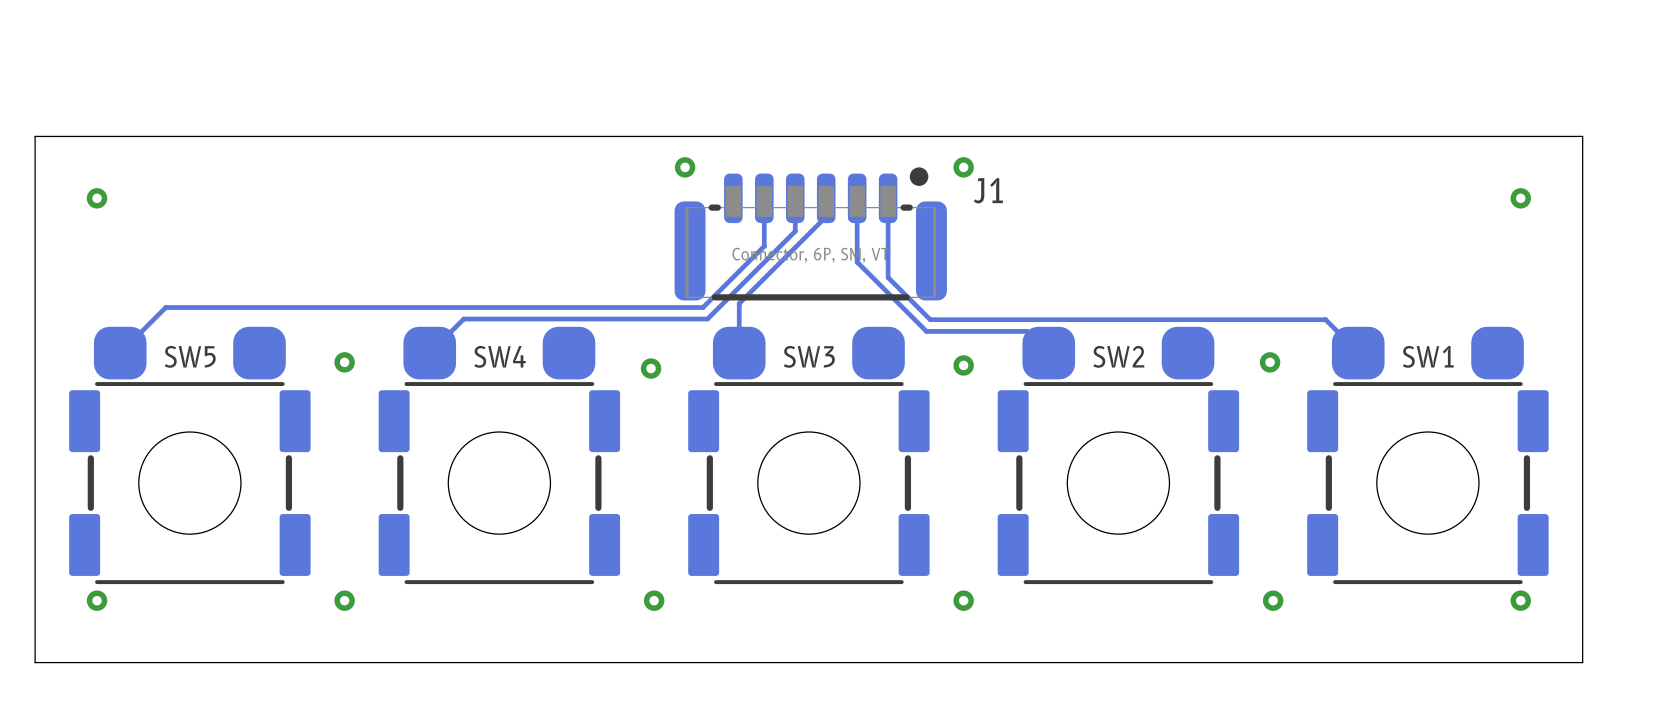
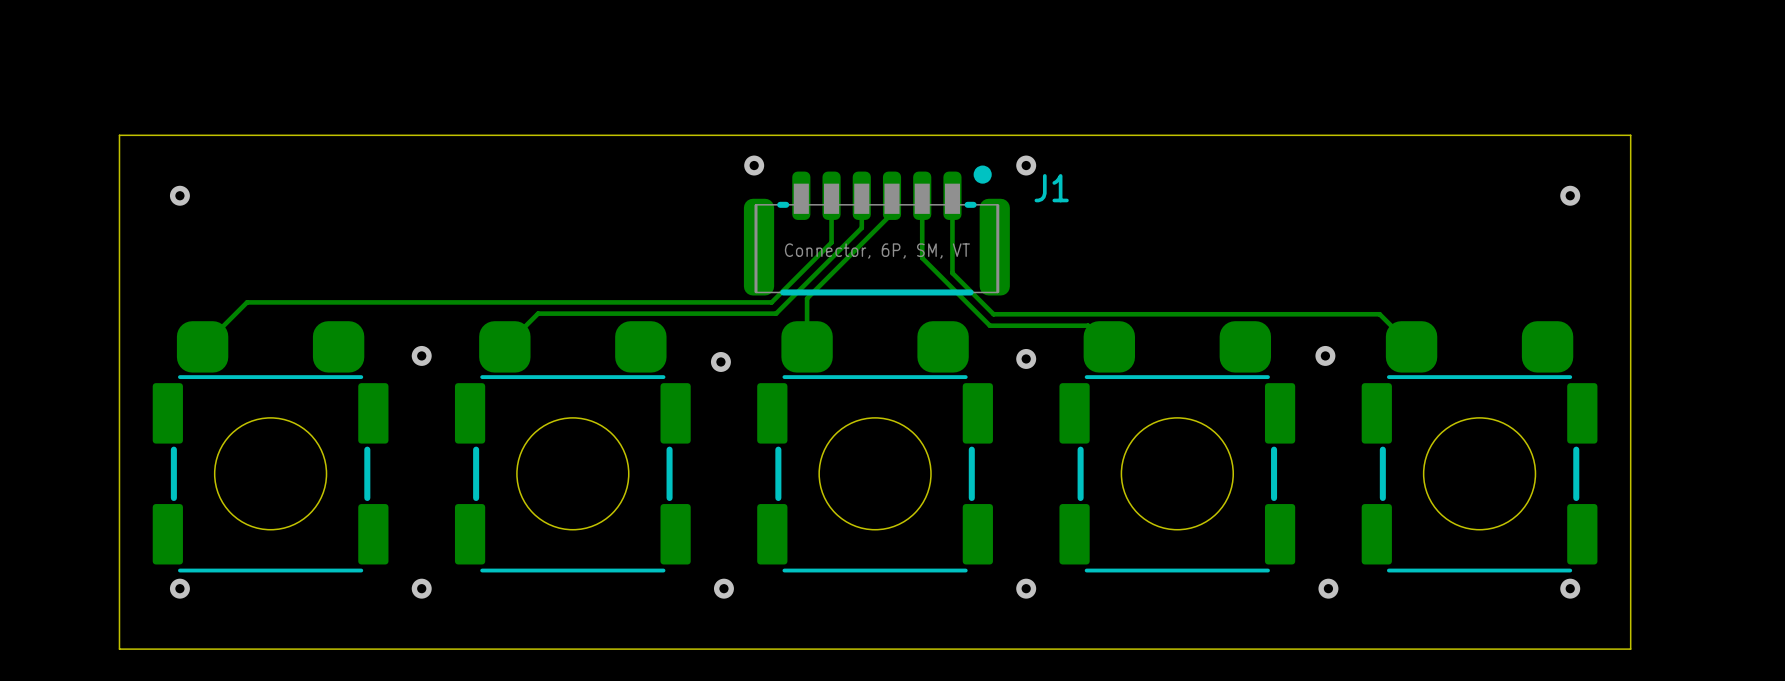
SW5: (189, 455) -> none
part: none -> (270, 446)
SW4: (499, 455) -> none
part: none -> (572, 446)
SW3: (808, 455) -> none
part: none -> (875, 446)
SW2: (1118, 455) -> none
part: none -> (1177, 446)
SW1: (1427, 455) -> none
part: none -> (1479, 446)

